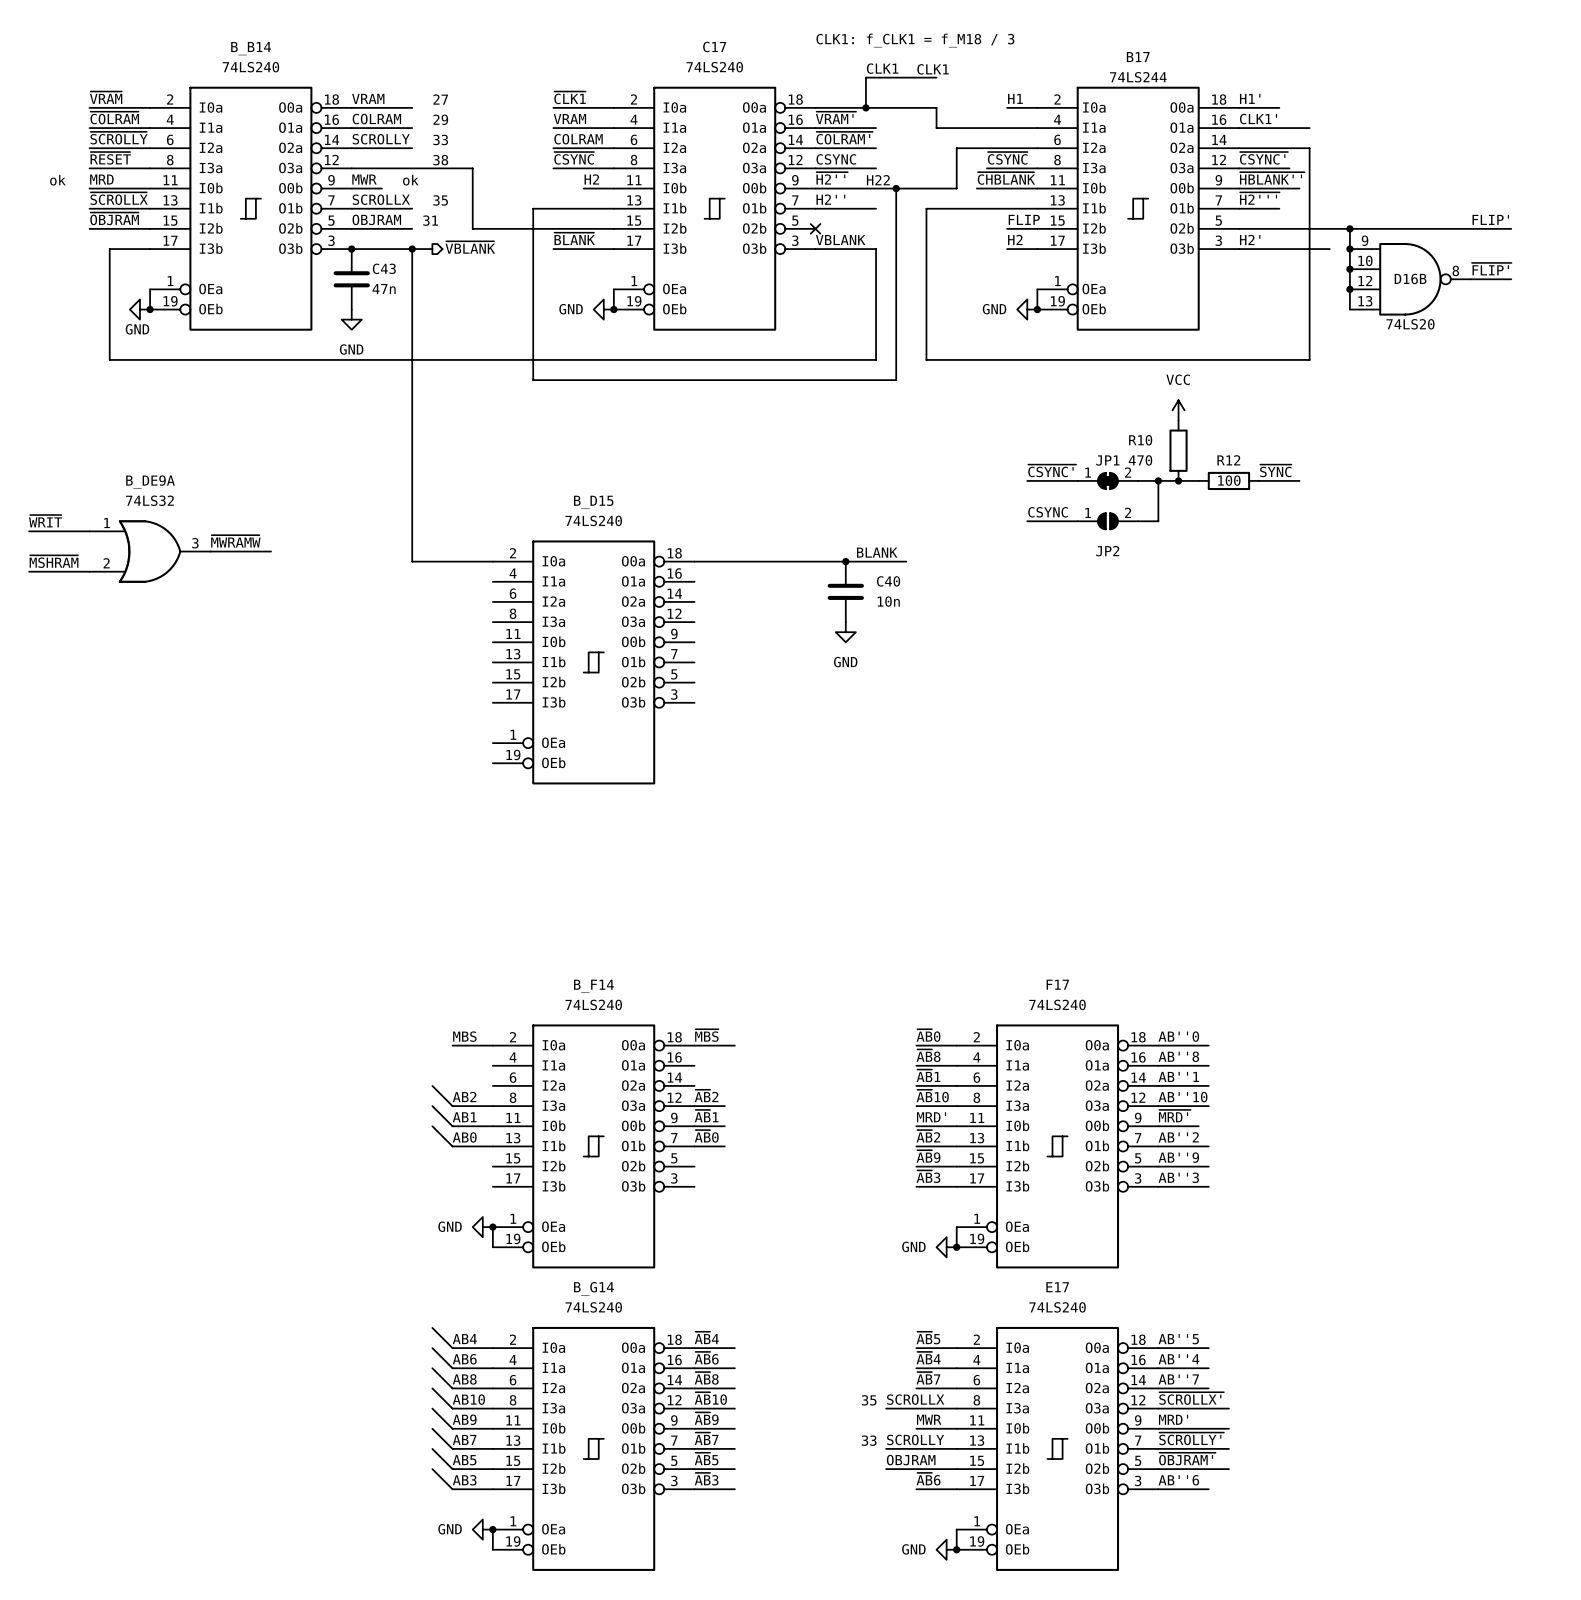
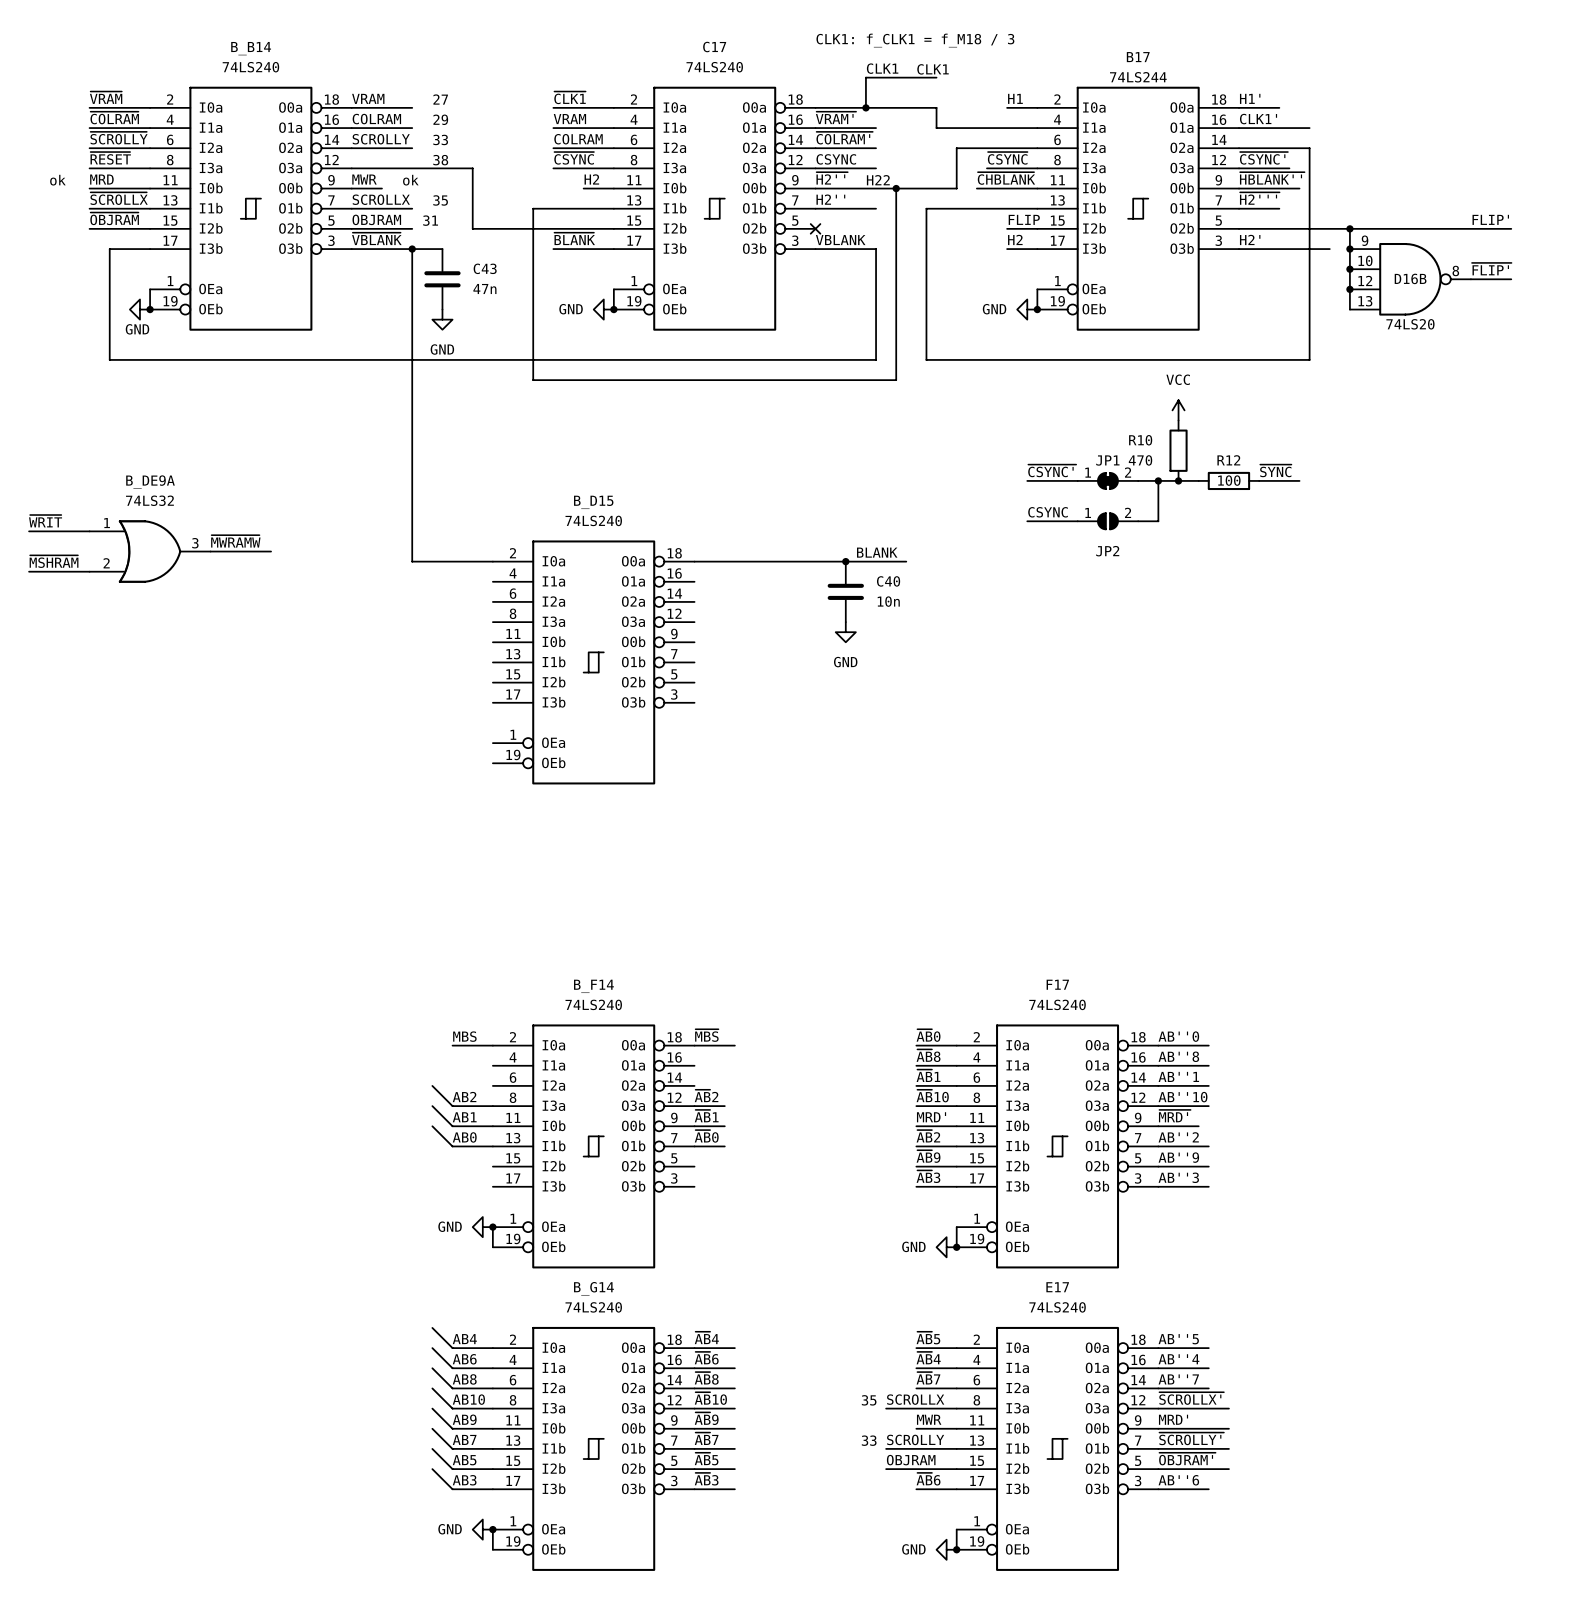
label: none -> ~{VBLANK} (376, 238)
hierarchical label: ~{VBLANK} (470, 247) -> none
junction: (351, 249) -> none
wire: none -> (432, 249) (442, 249)
C43 name position: C43 (384, 268) -> C43 (485, 268)
C43 position: (351, 279) -> (442, 279)
C43 value position: 47n (384, 289) -> 47n (484, 289)
power symbol position: GND (351, 319) -> GND (442, 319)

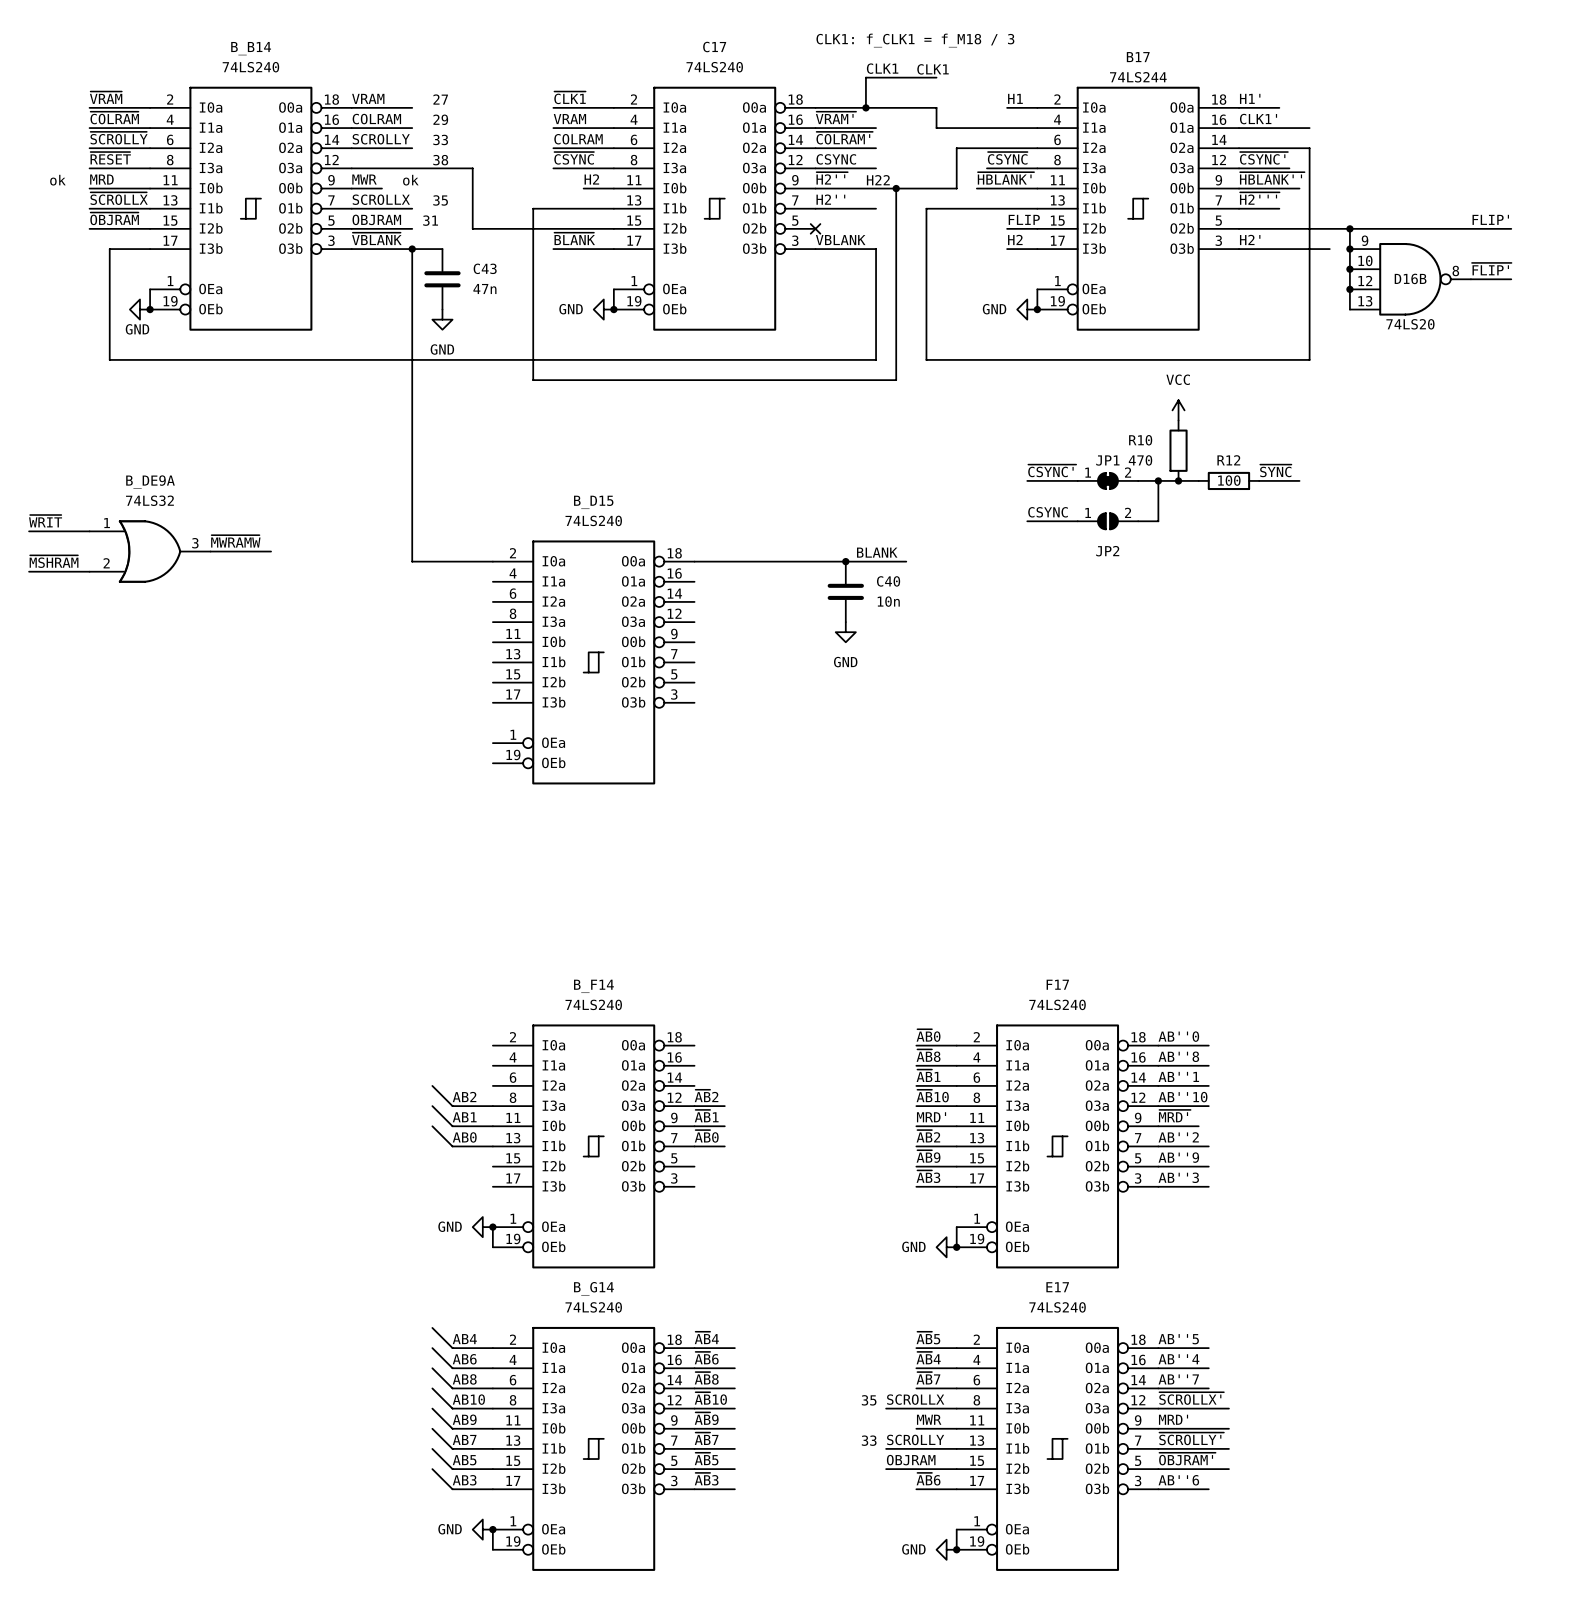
label: ~{CHBLANK} (1006, 178) -> ~{HBLANK'} (1005, 178)
label: ~{MBS} (706, 1035) -> none
label: MBS (464, 1036) -> none
wire: (452, 1045) (492, 1045) -> none
wire: (694, 1045) (734, 1045) -> none

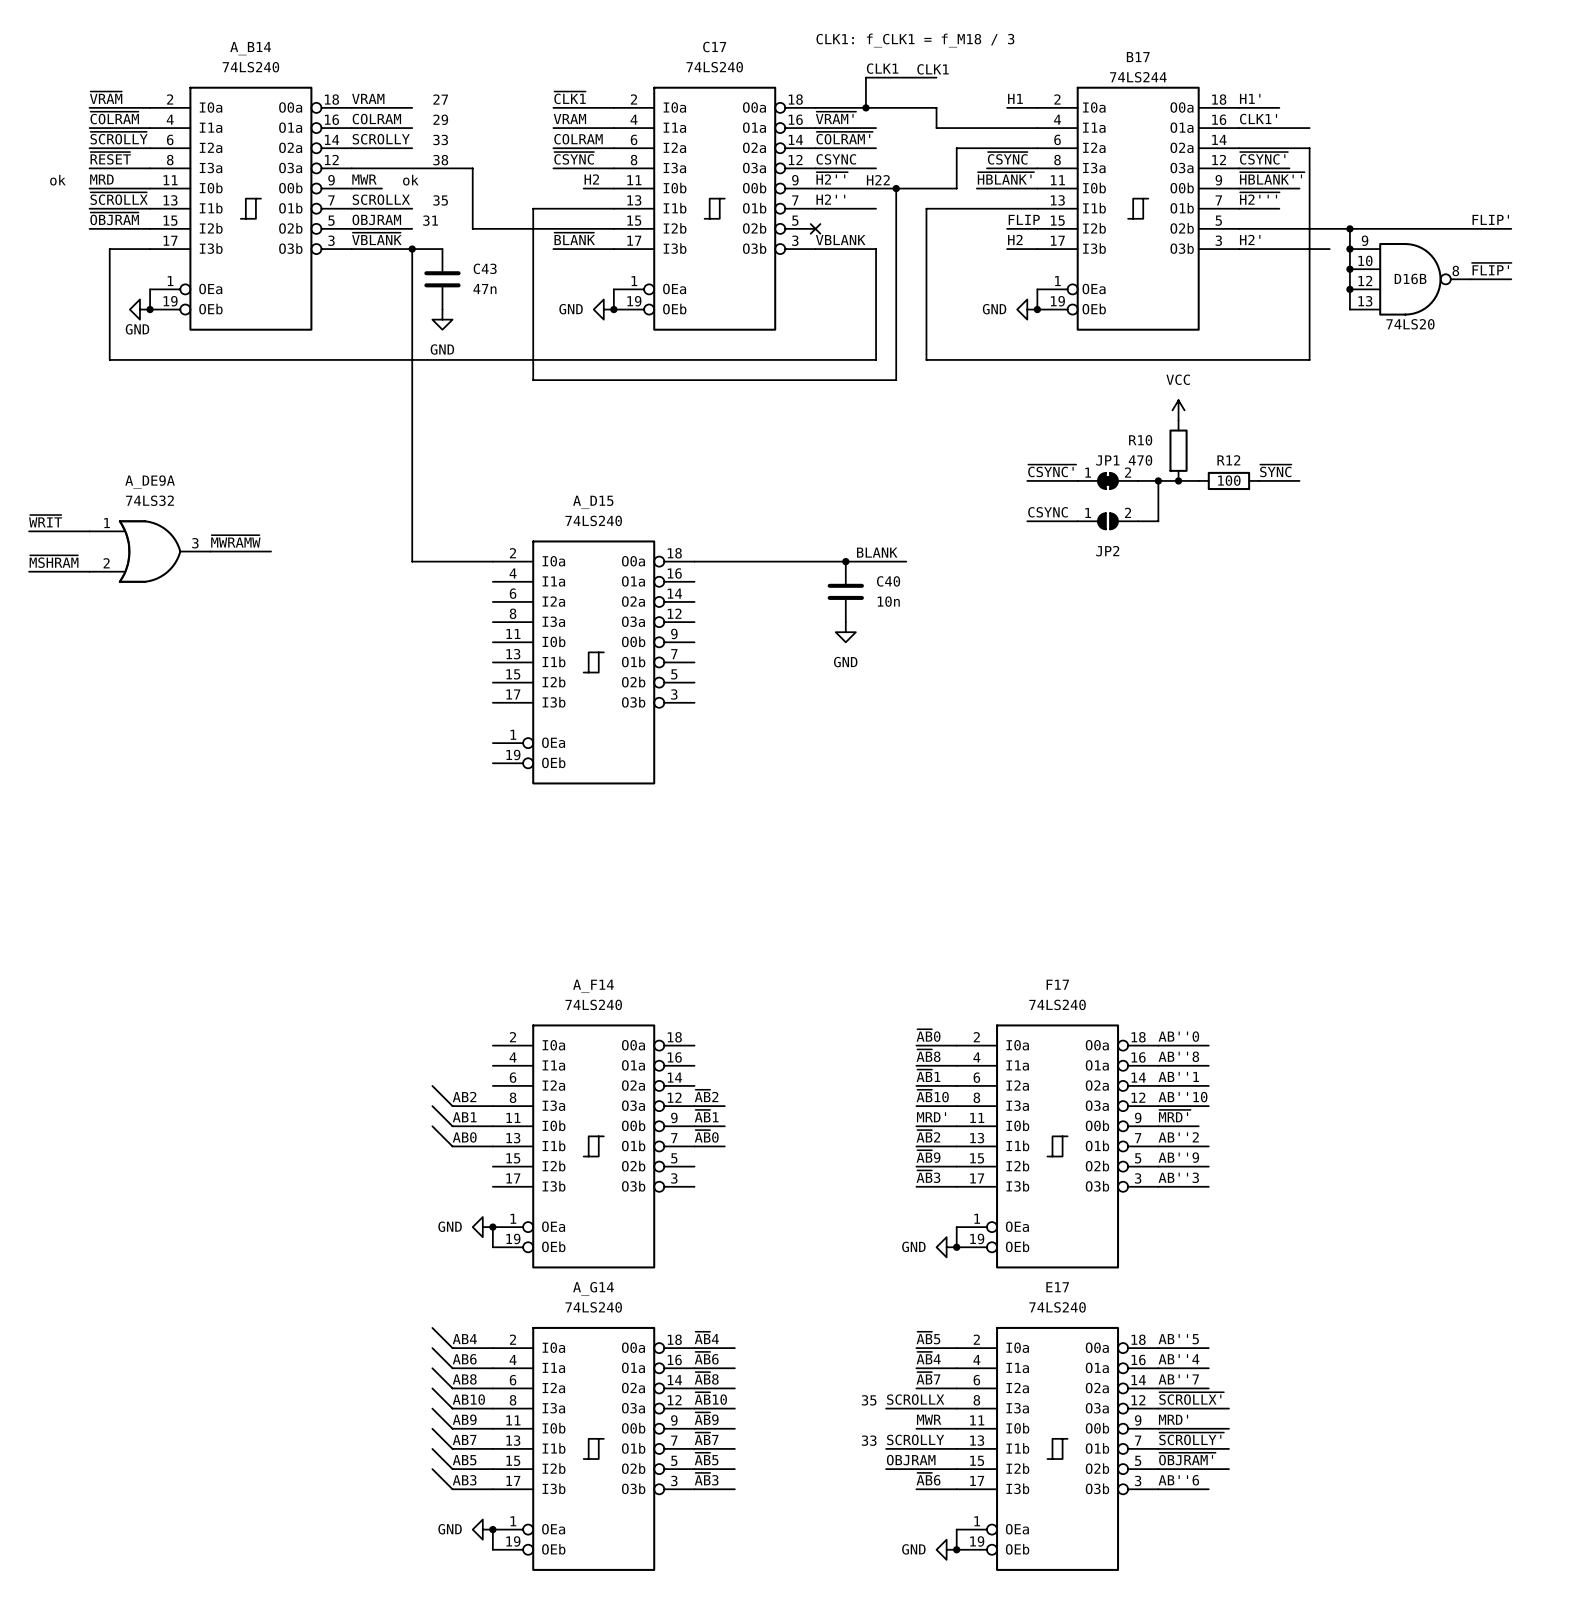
B_B14 name: B_B14 (251, 48) -> A_B14 (250, 48)
B_DE9A name: B_DE9A (150, 482) -> A_DE9A (150, 482)
B_D15 name: B_D15 (593, 502) -> A_D15 (593, 502)
B_F14 name: B_F14 (593, 986) -> A_F14 (593, 986)
B_G14 name: B_G14 (593, 1288) -> A_G14 (593, 1288)

